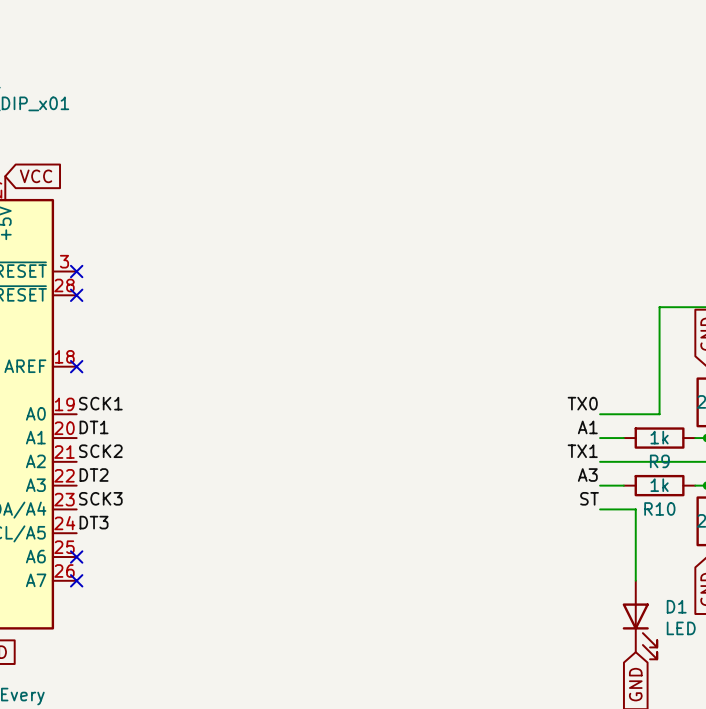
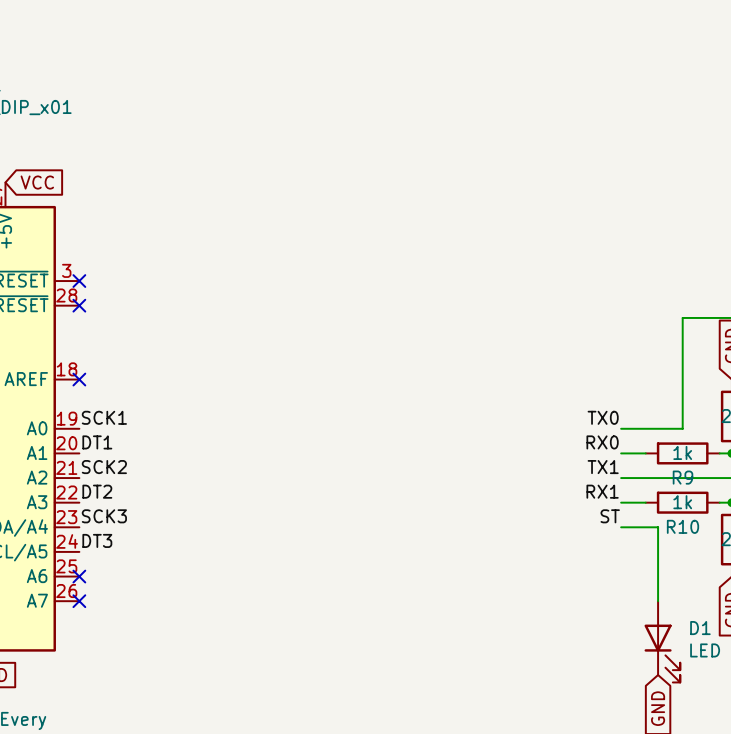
label: A1 (587, 427) -> RX0 (602, 442)
label: A3 (587, 475) -> RX1 (602, 491)

